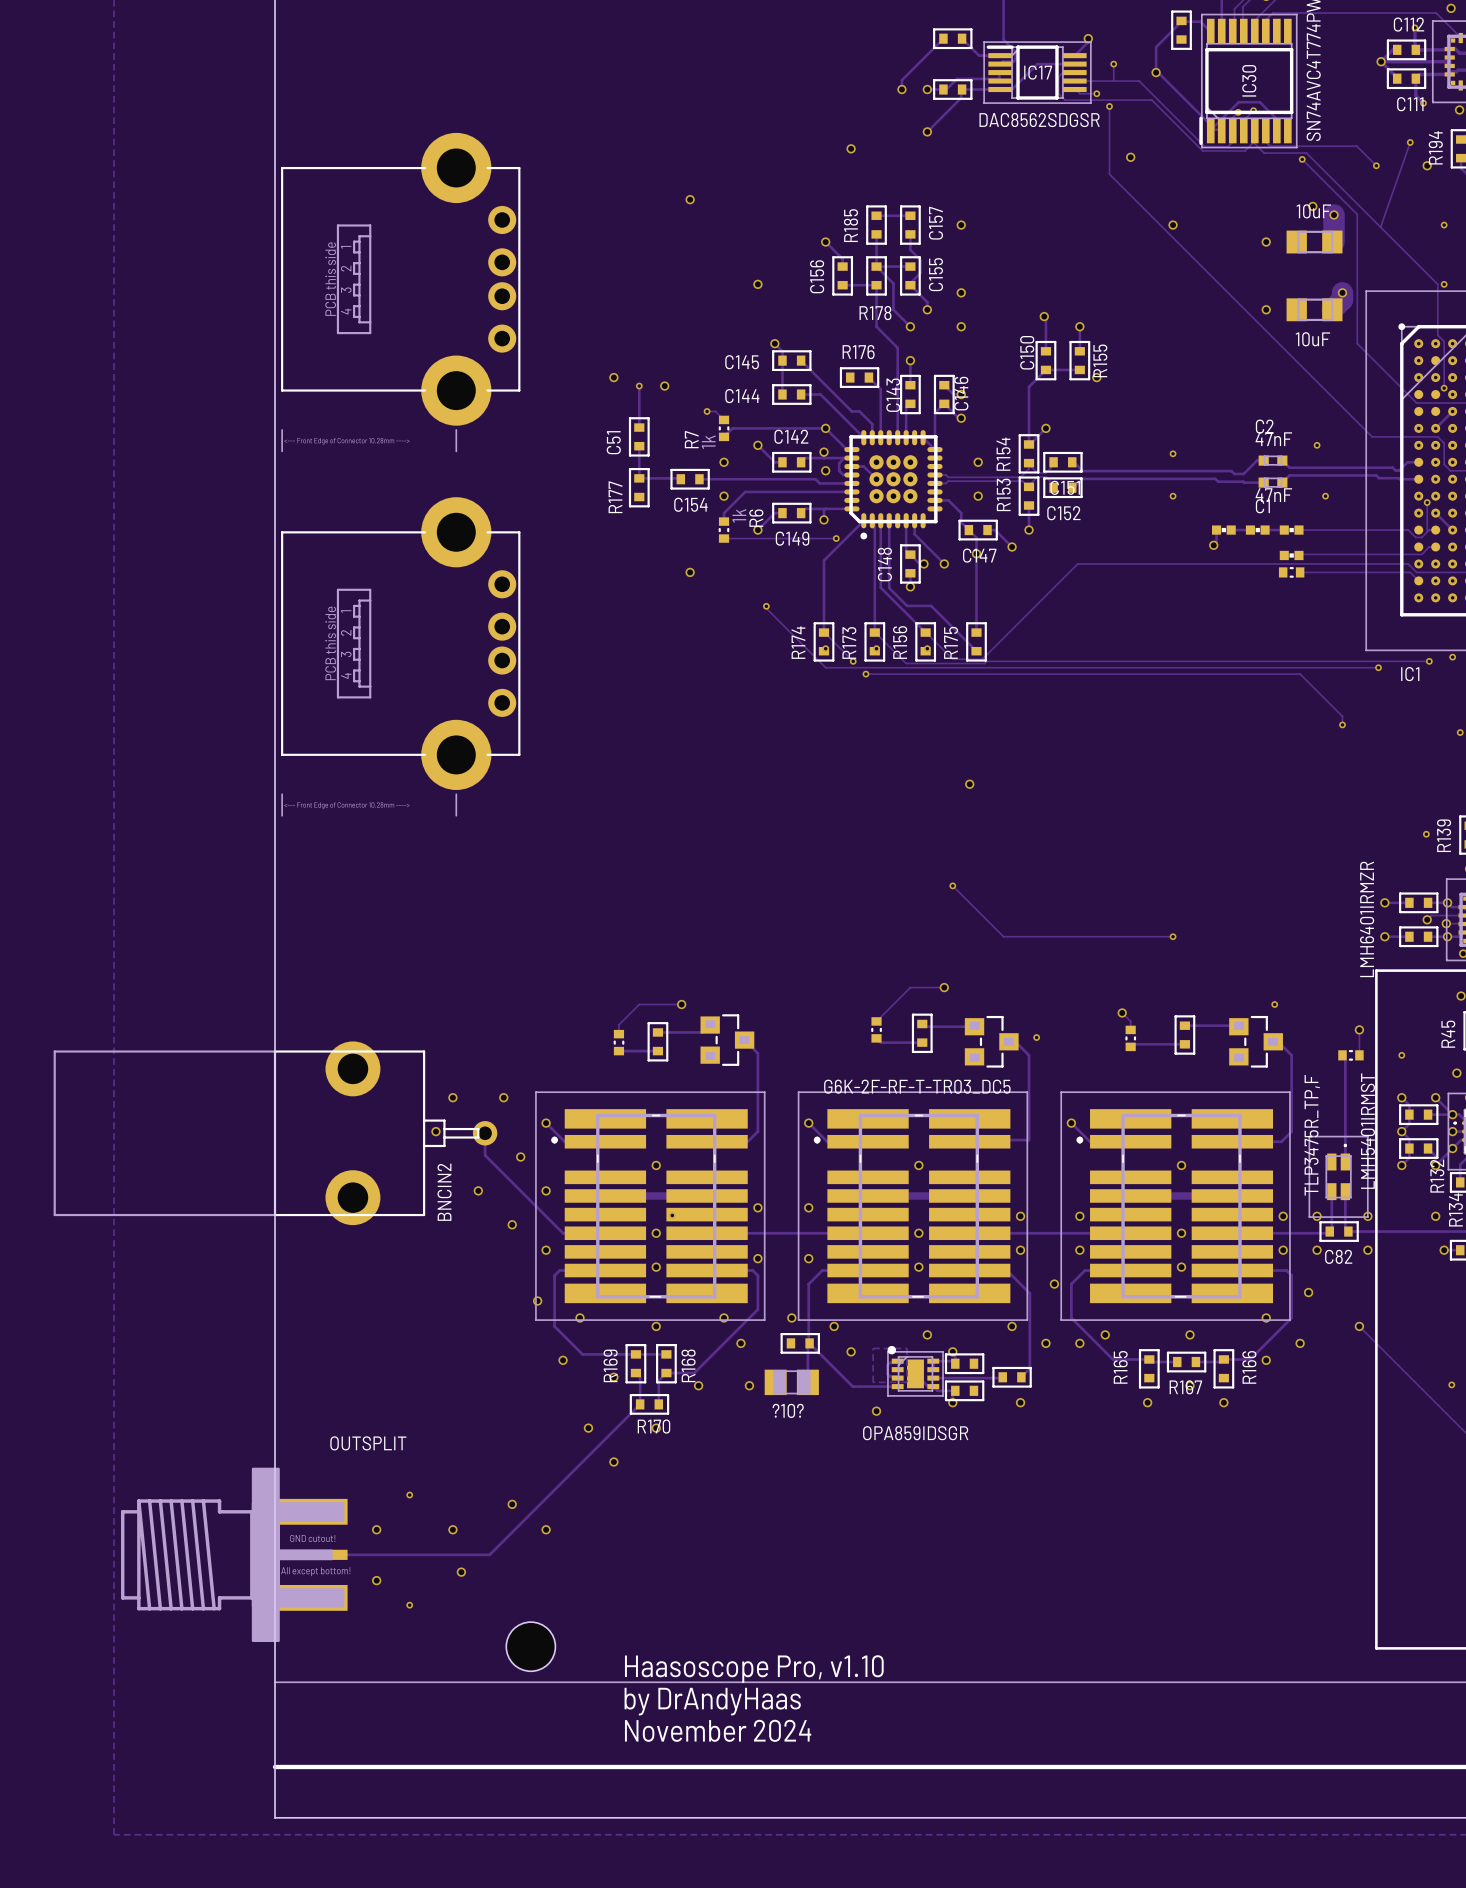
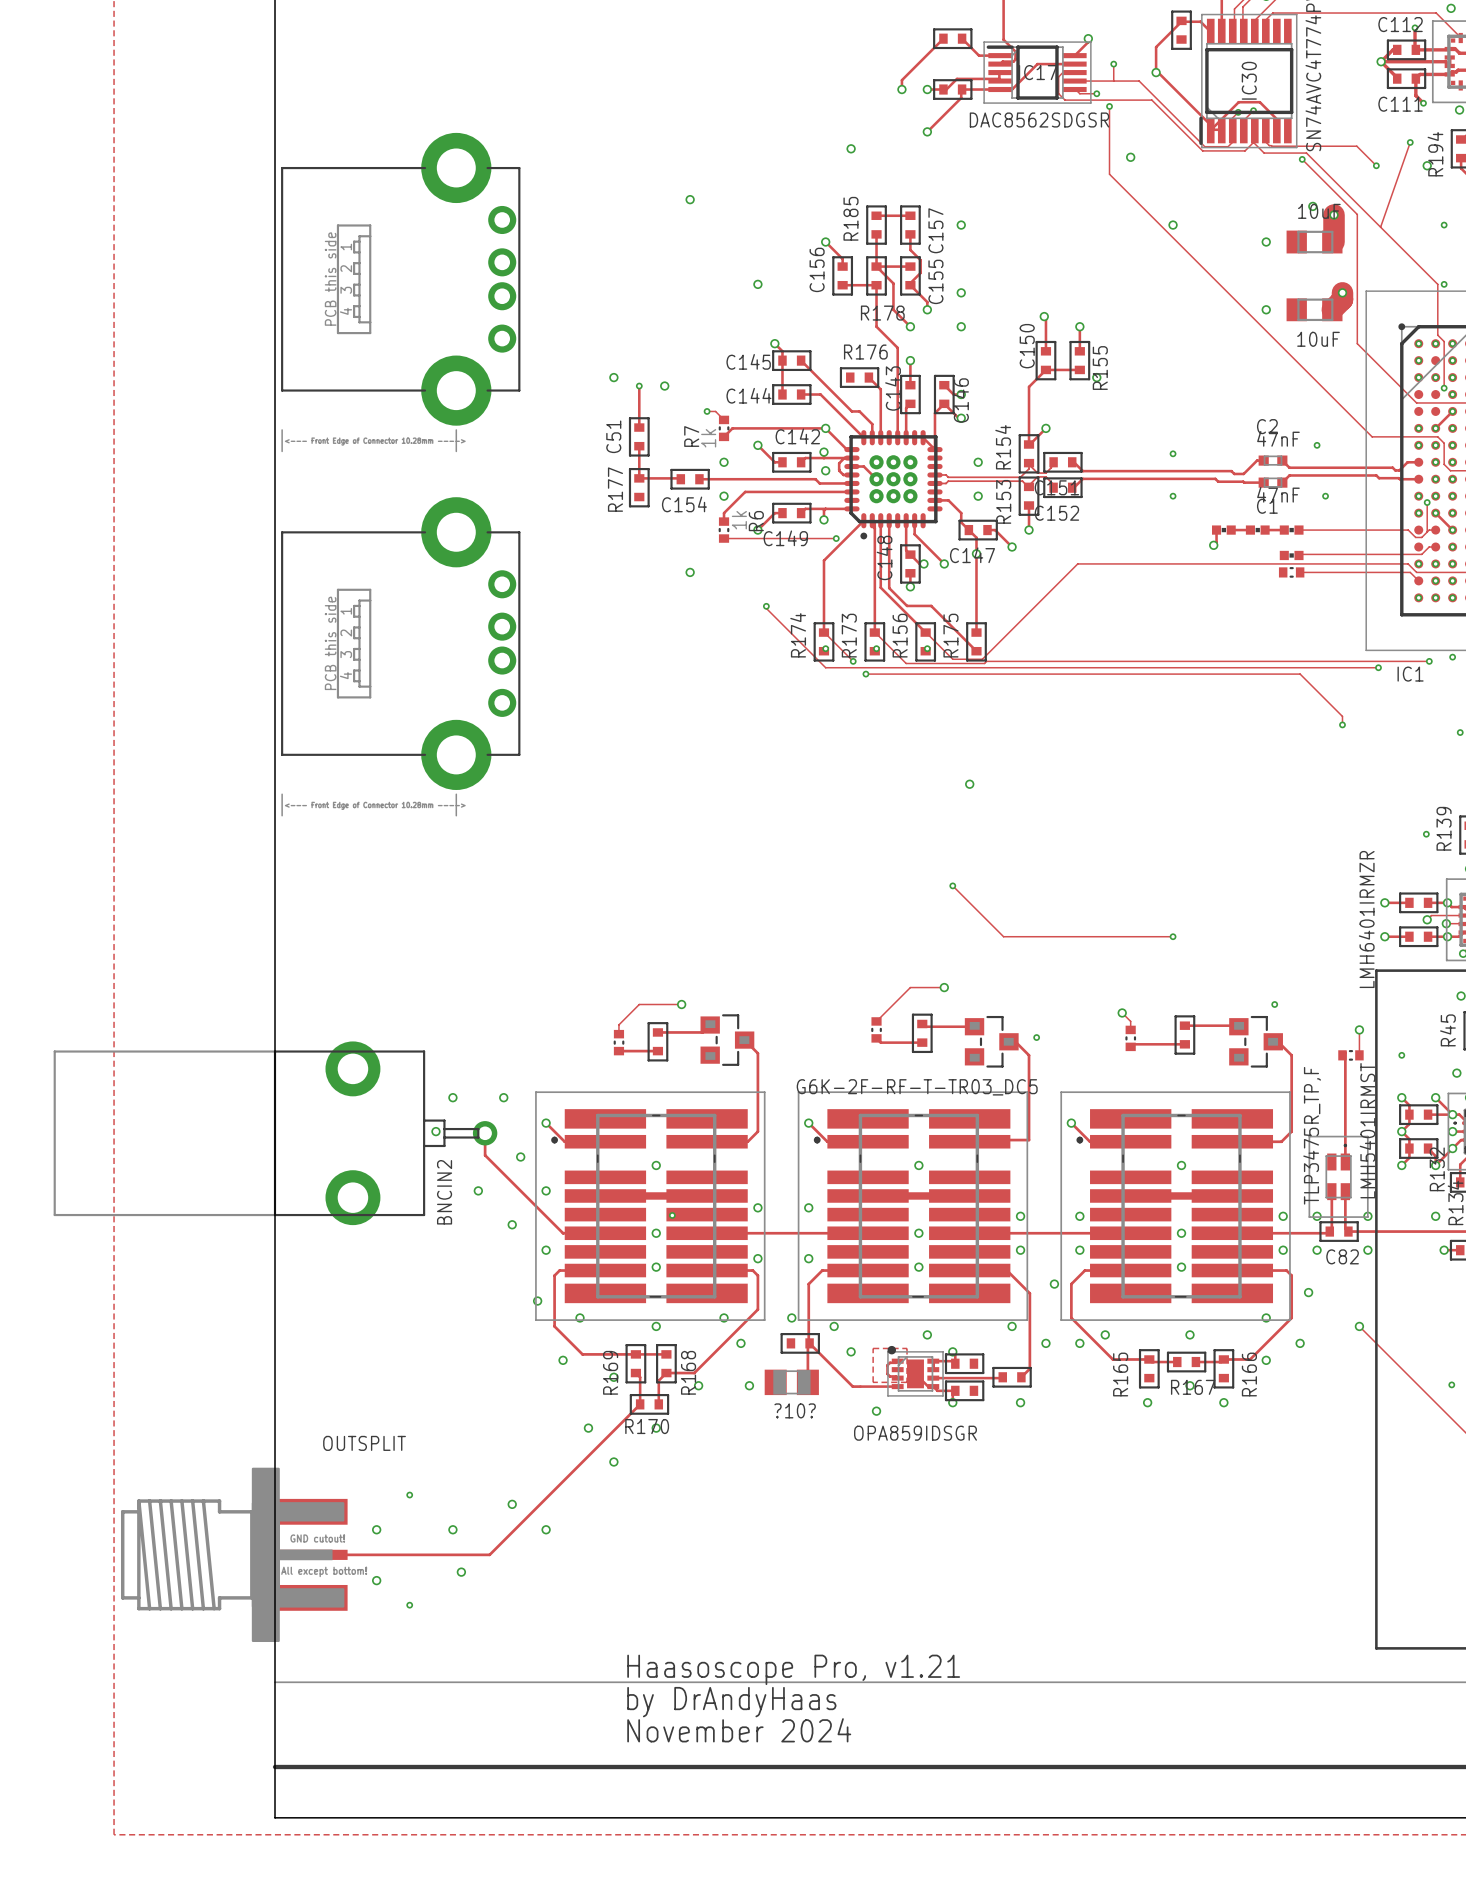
hole: (530, 1646) -> none
text: Haasoscope Pro, v1.10 (754, 1669) -> Haasoscope Pro, v1.21 (793, 1669)

